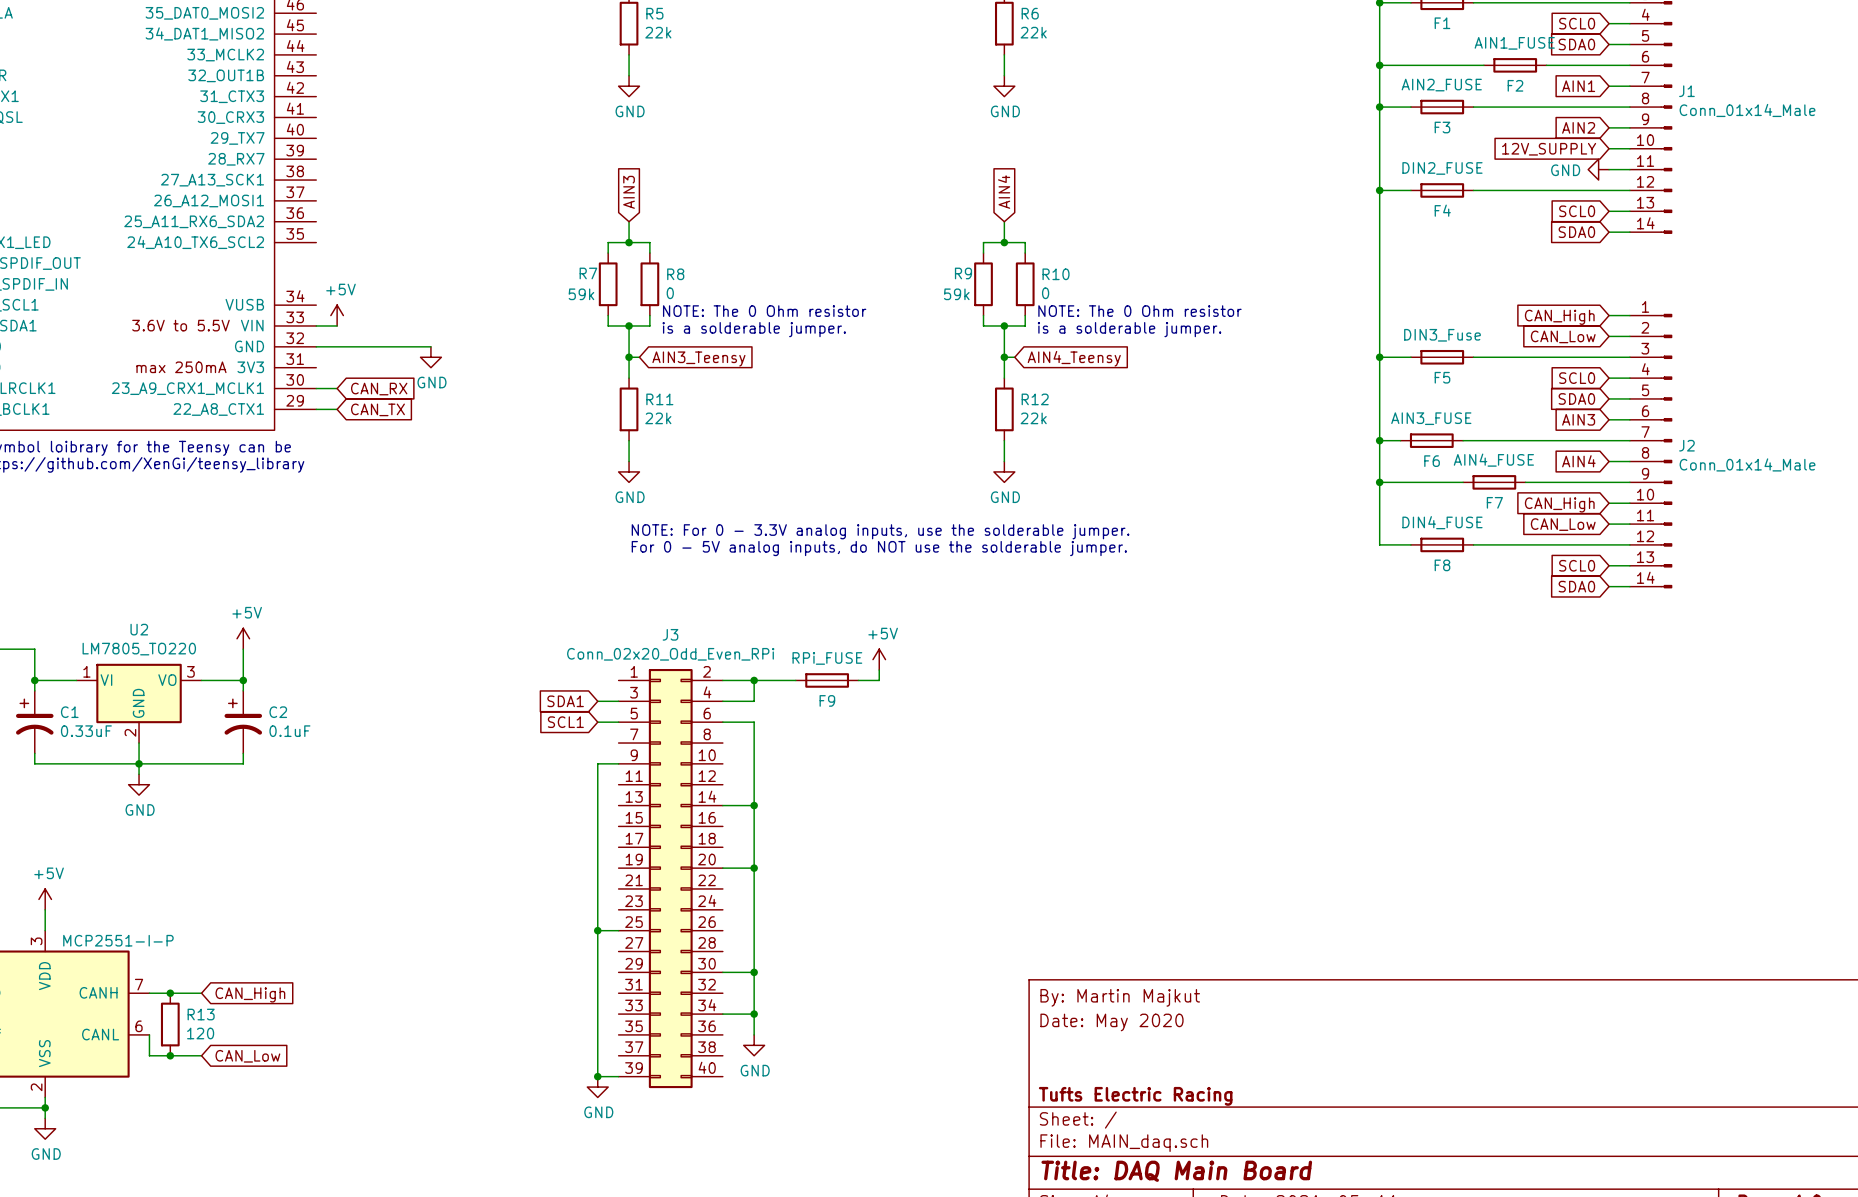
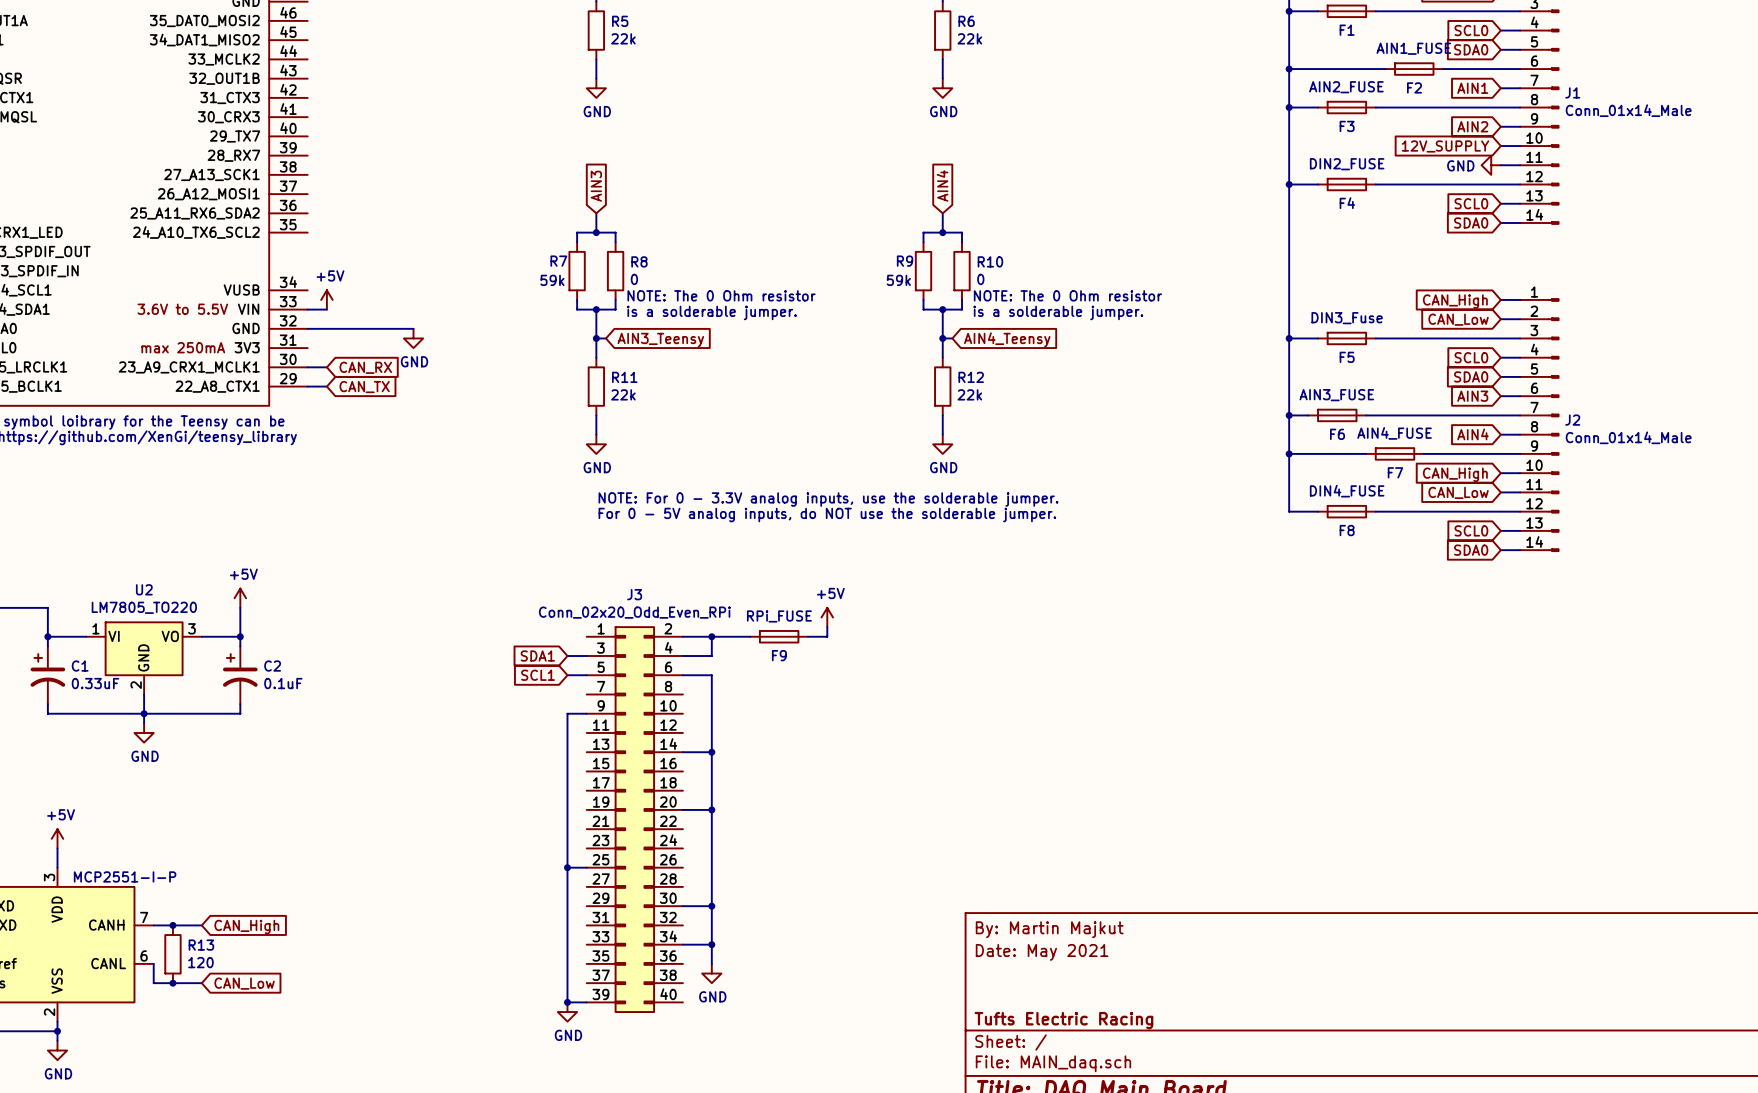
title block: Date: May 2020 (1112, 1022) -> Date: May 2021 (1042, 952)

